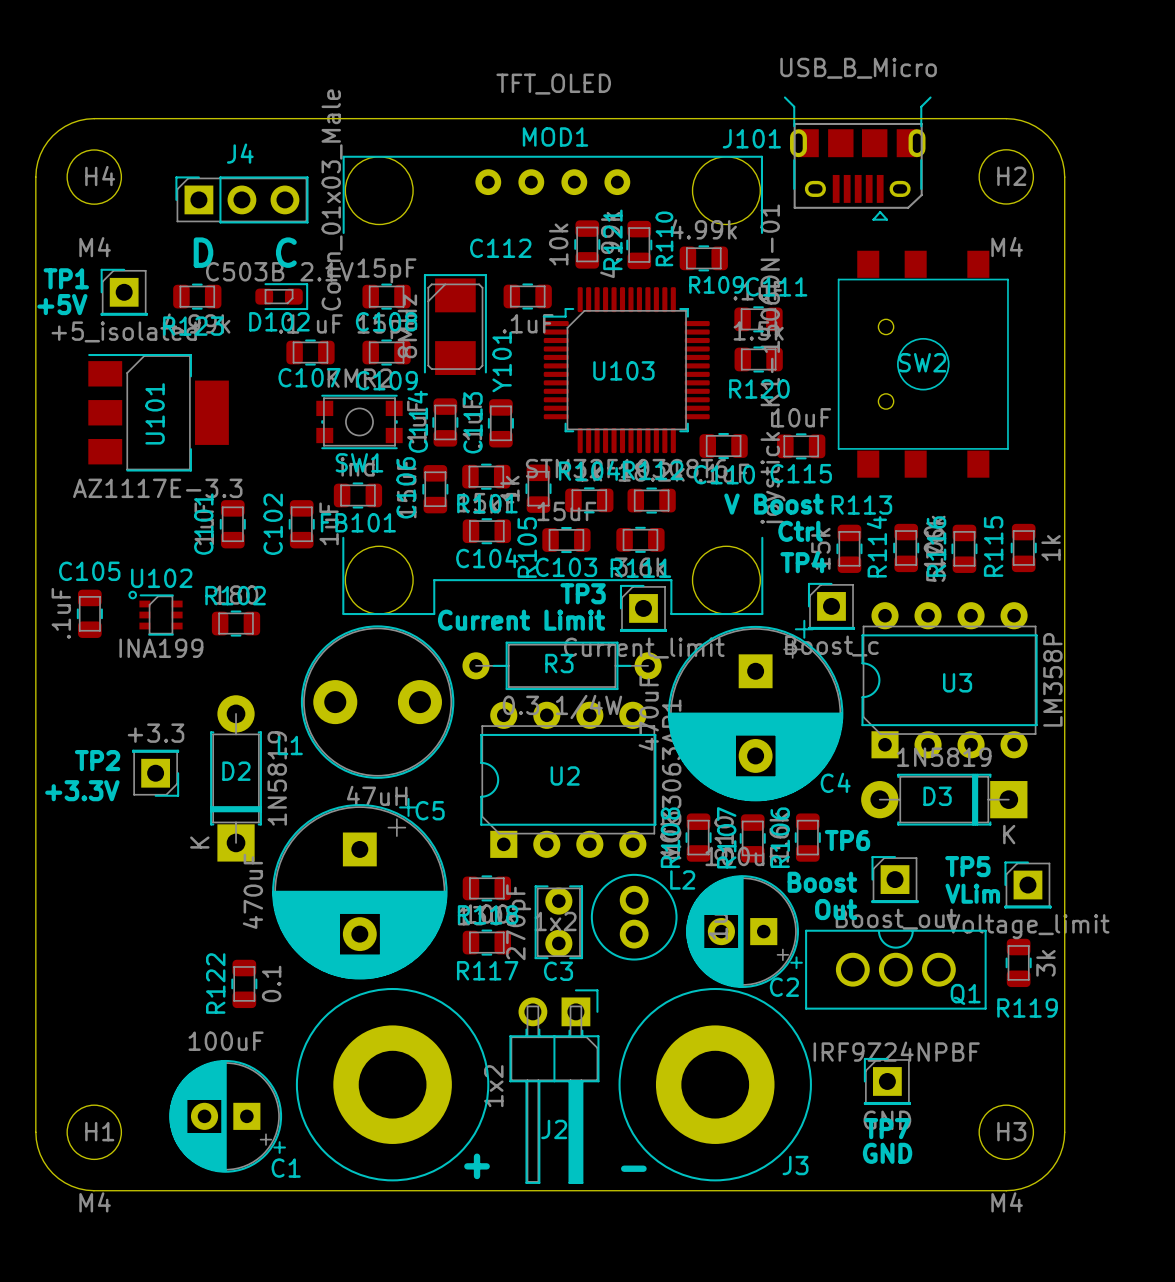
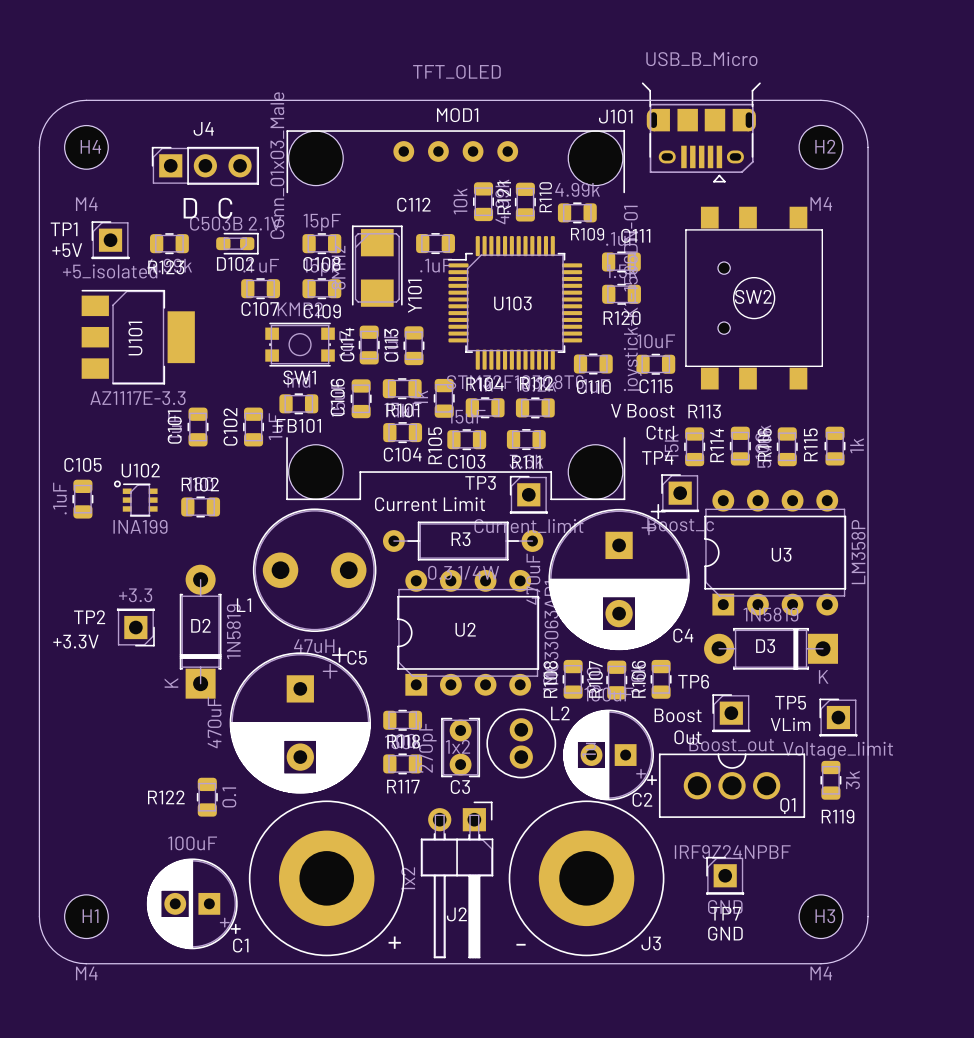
R122 name rotation: 0° (215, 983) -> 90° clockwise (166, 797)

